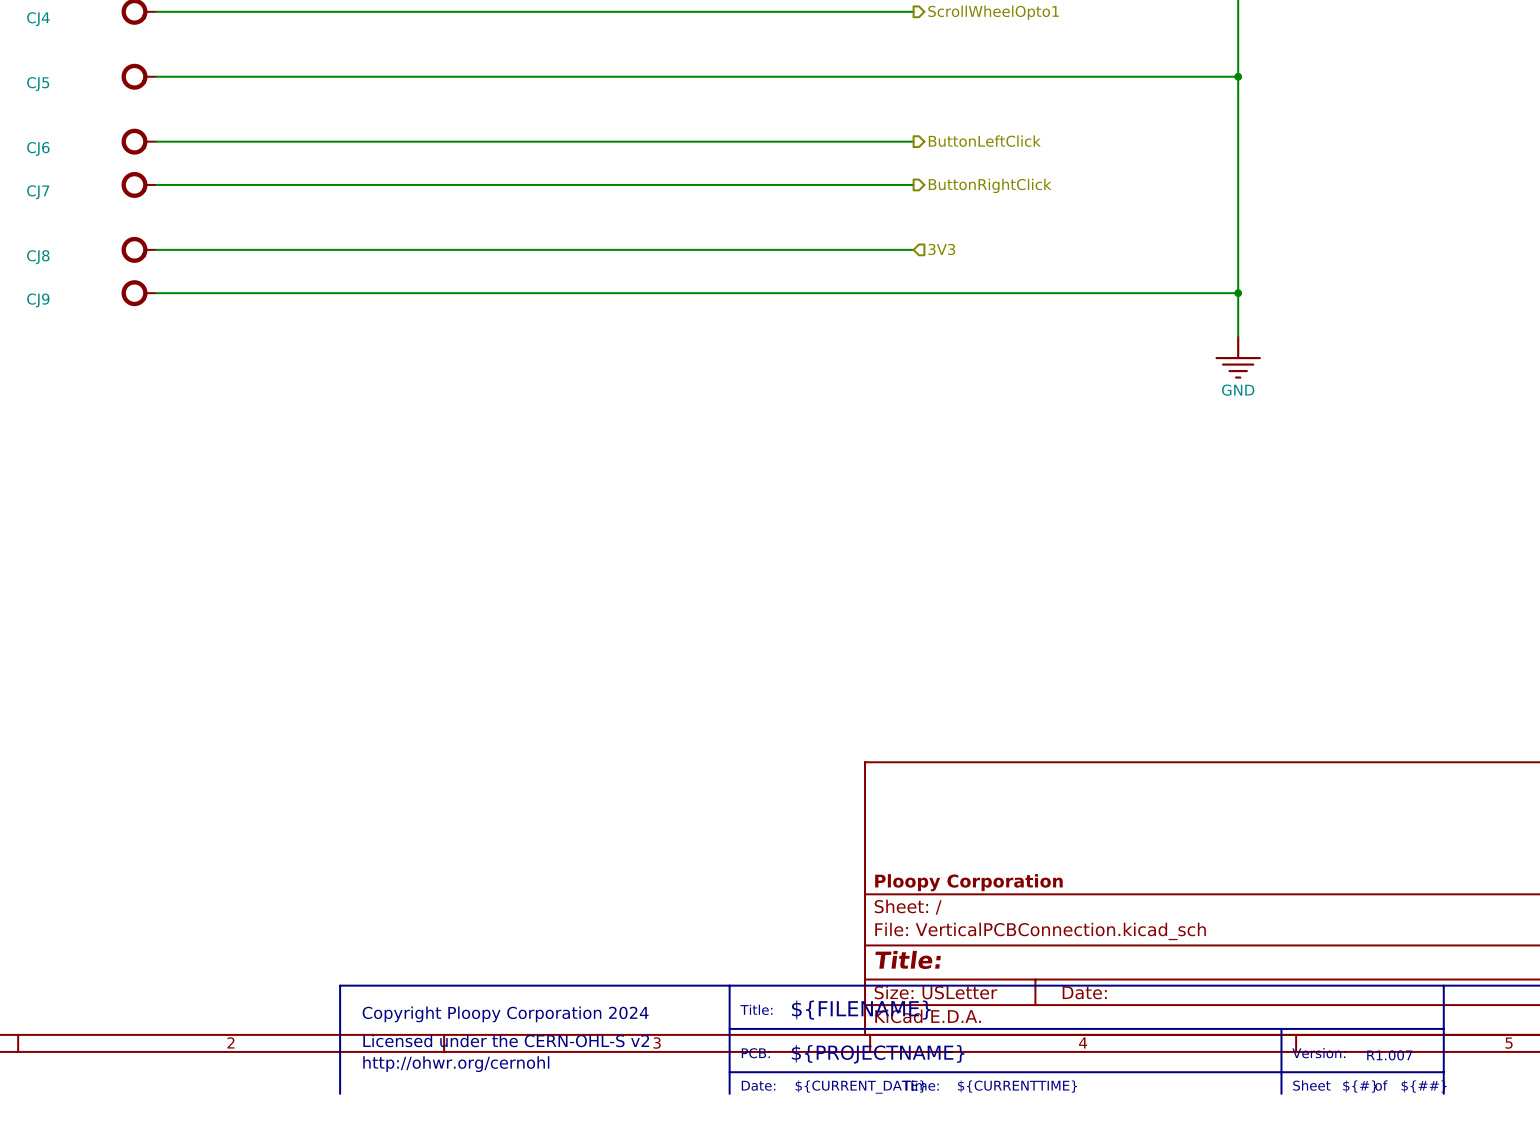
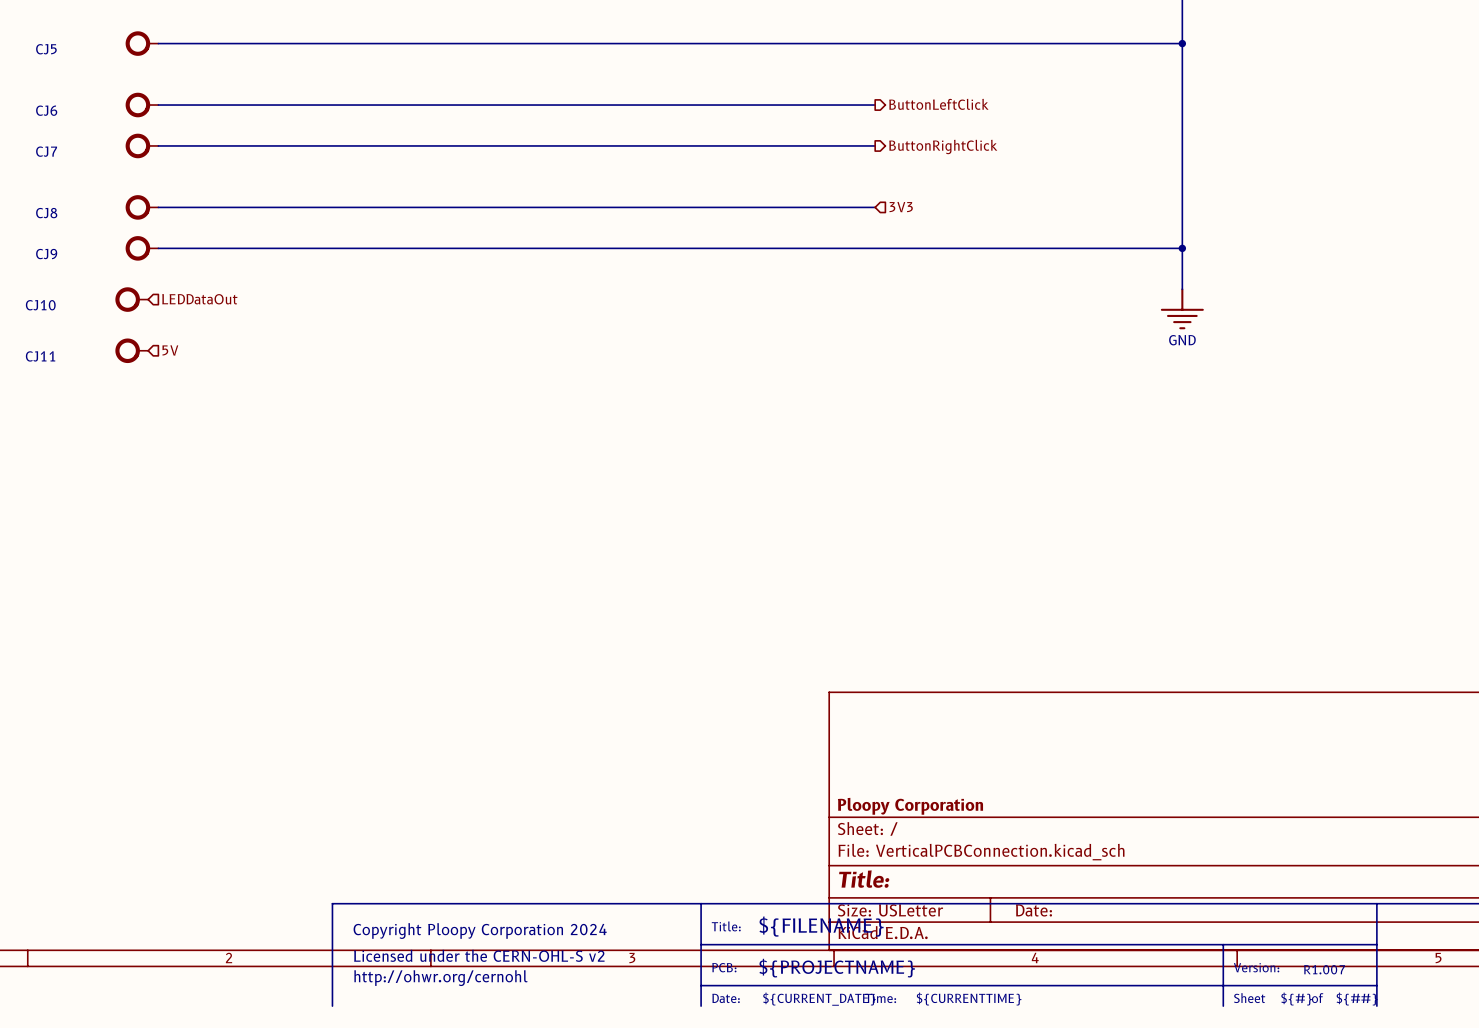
hierarchical label: none -> LEDDataOut (199, 299)
CJ10: none -> (131, 299)
CJ11: none -> (131, 350)
hierarchical label: none -> 5V (170, 350)

